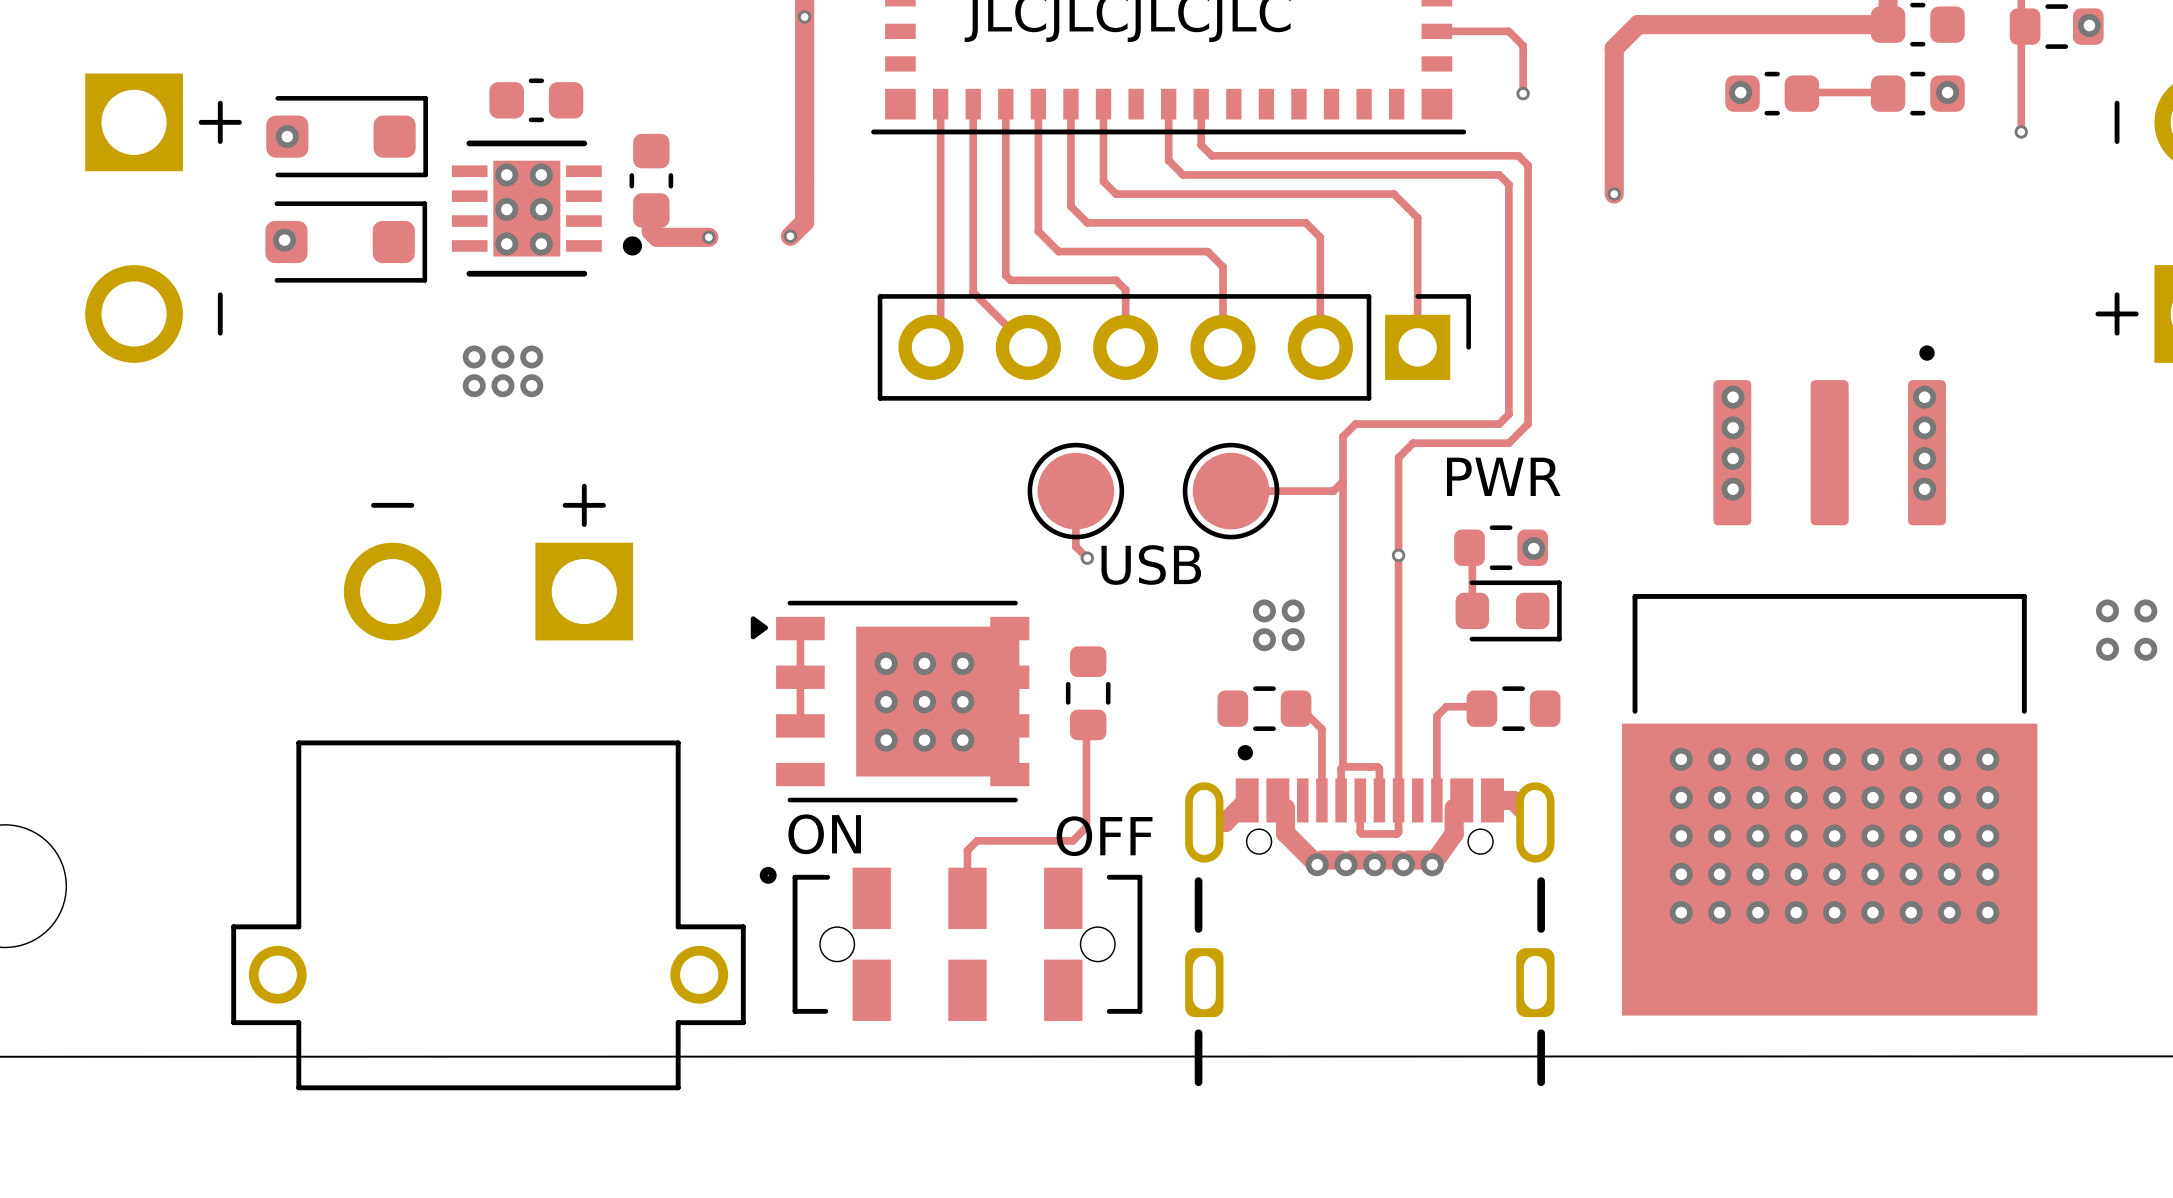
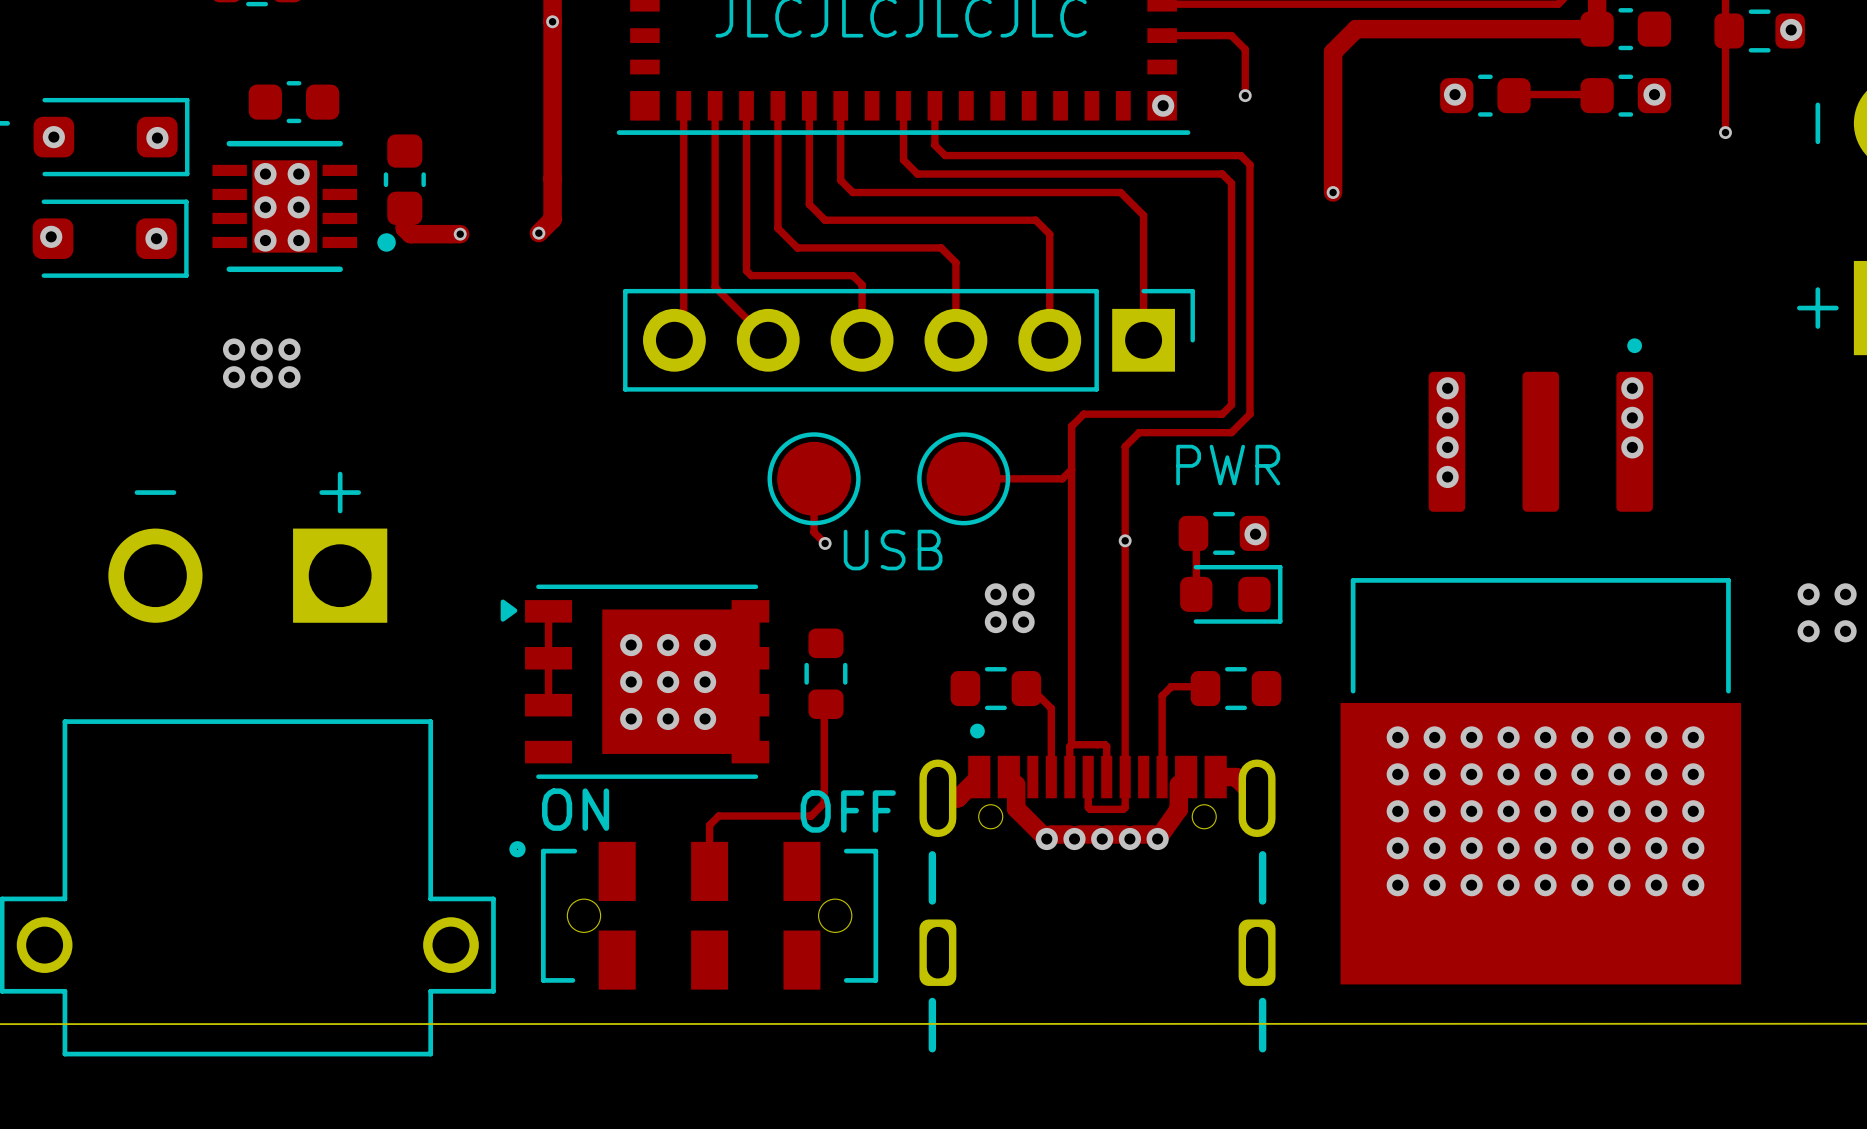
via: none -> (1163, 105)
via: none -> (157, 138)
via: none -> (156, 238)
via: (1924, 489) -> none

